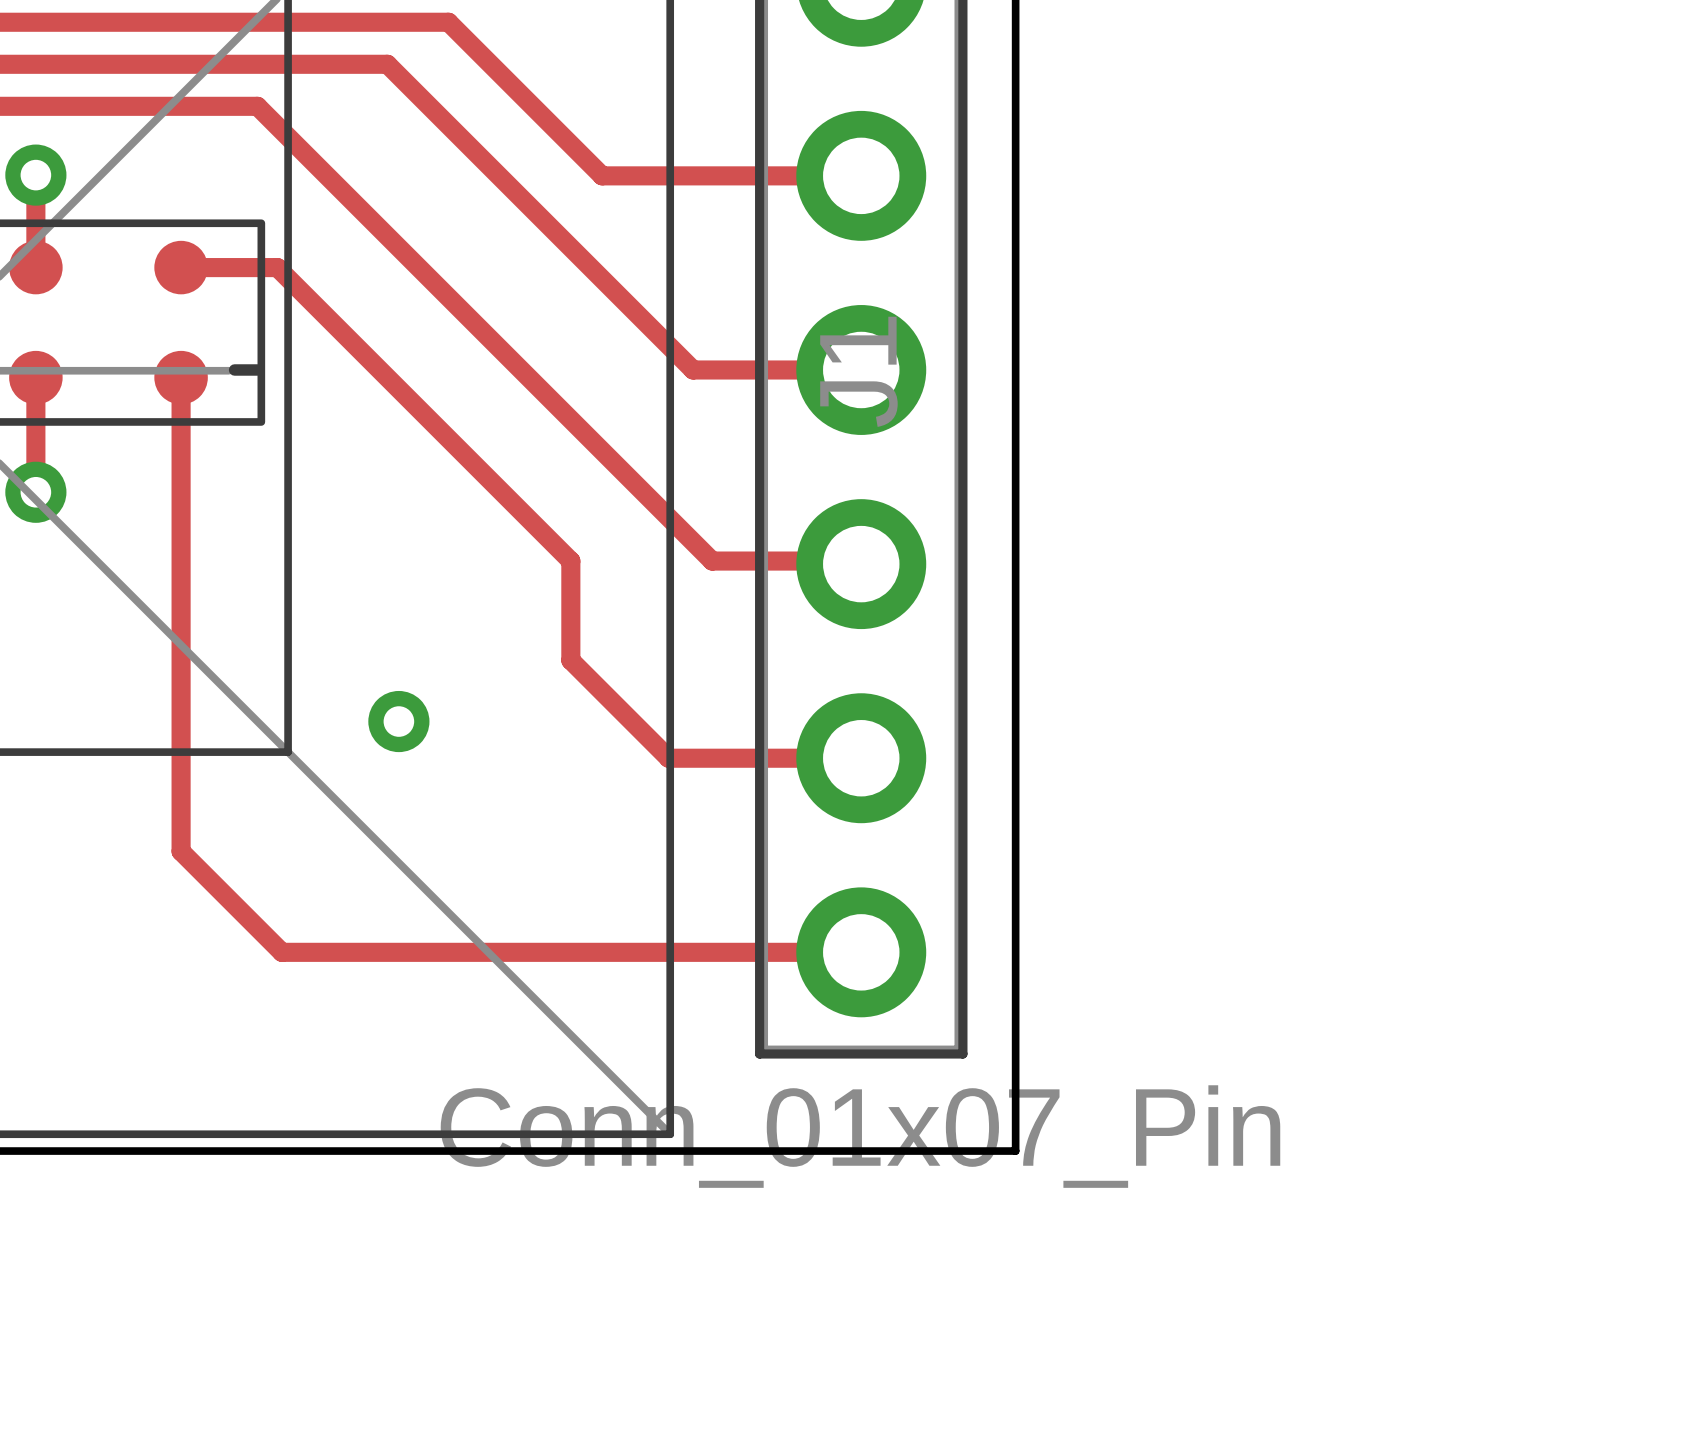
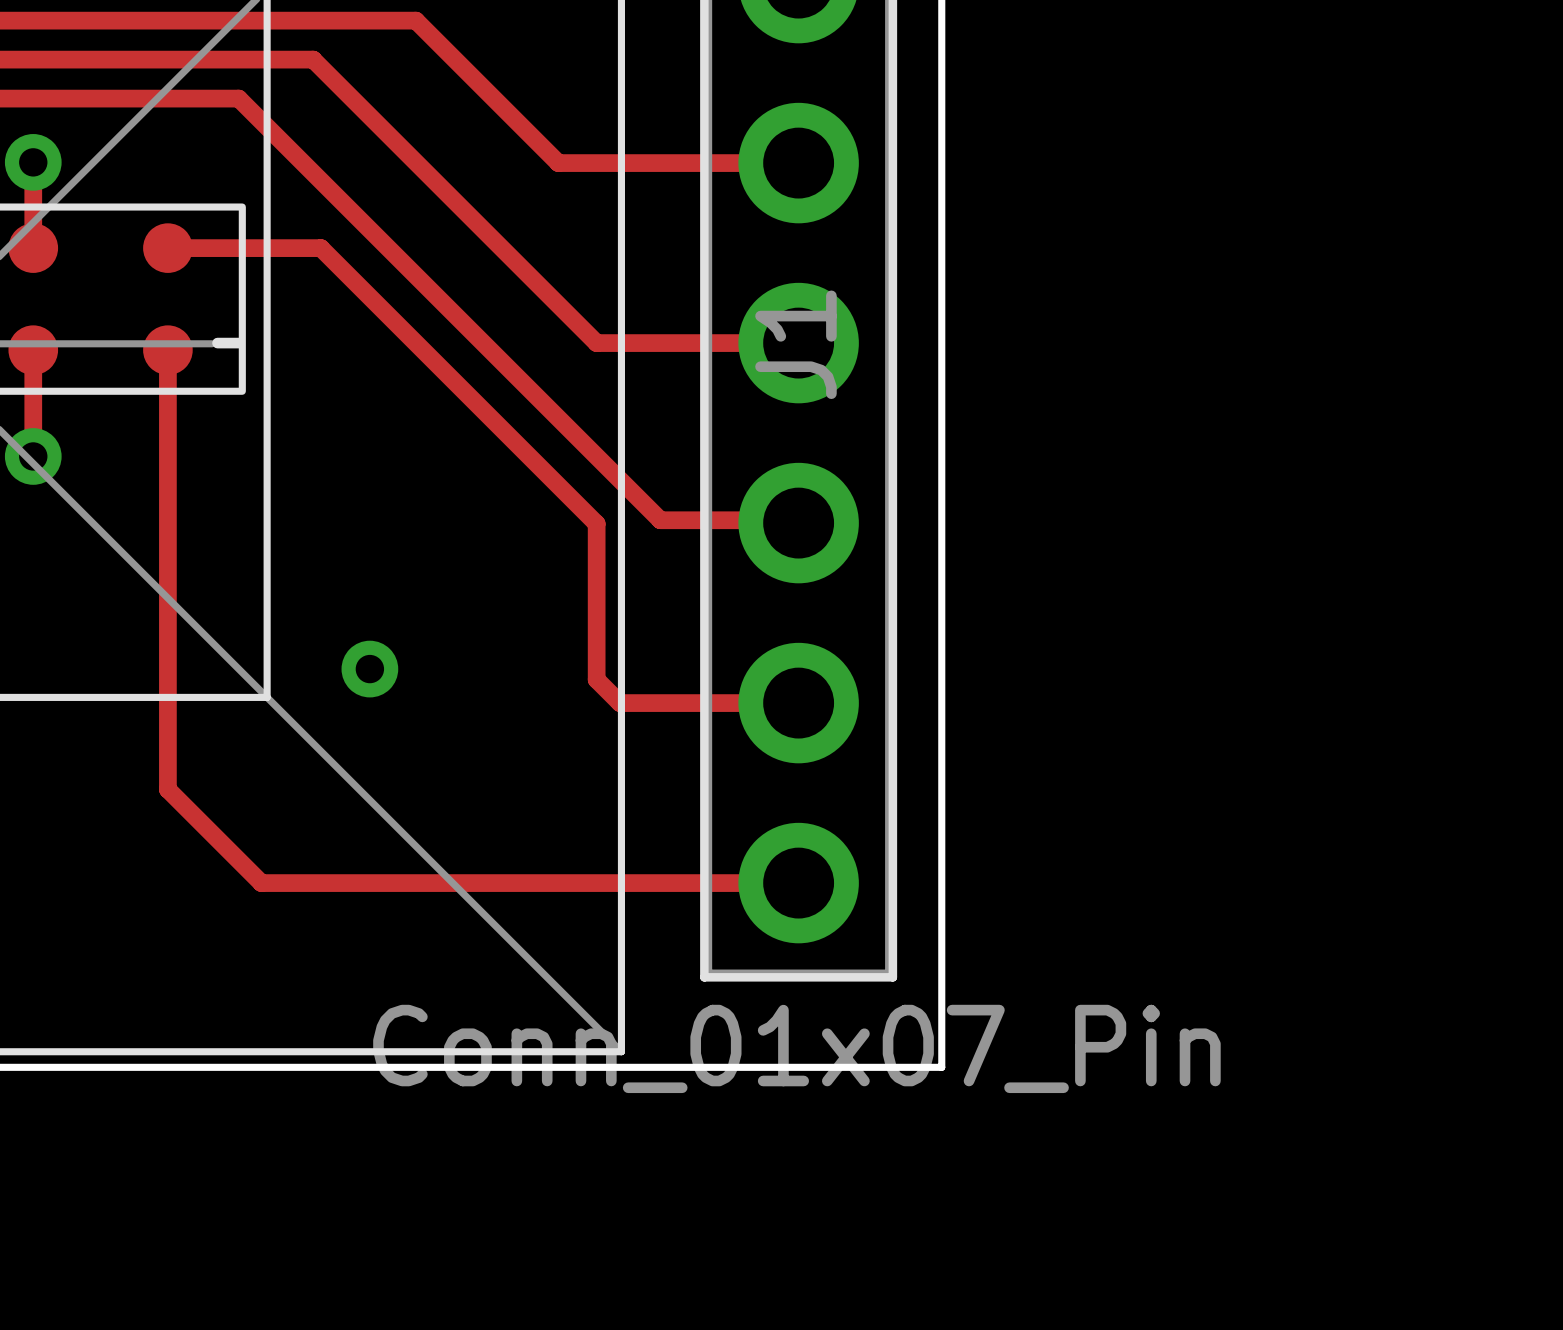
track: (337, 64) (387, 64) (693, 369) -> (313, 59) (596, 343) (642, 343)
track: (277, 267) (570, 561) (570, 660) (643, 733) -> (257, 248) (320, 248) (596, 523) (596, 679)

